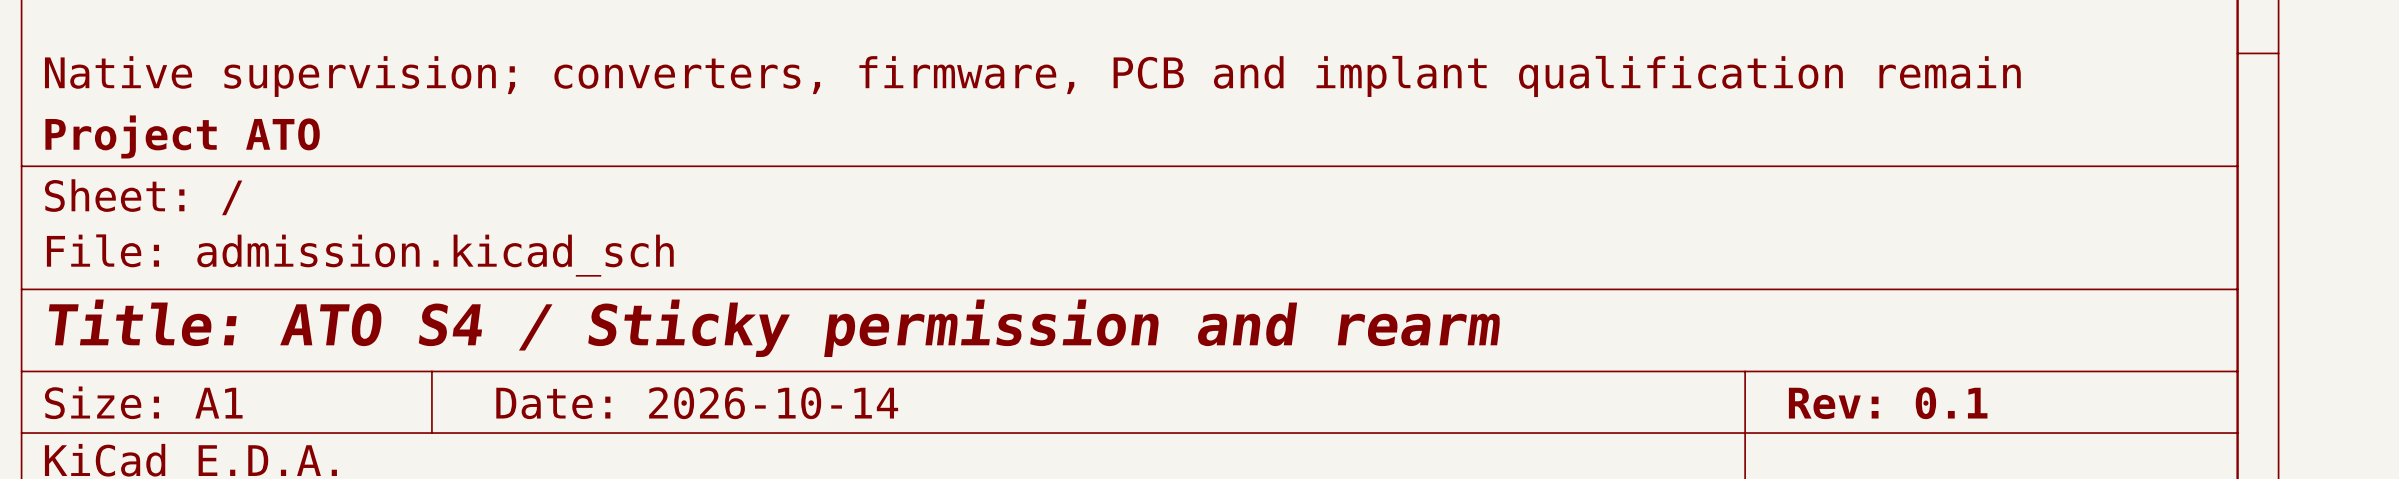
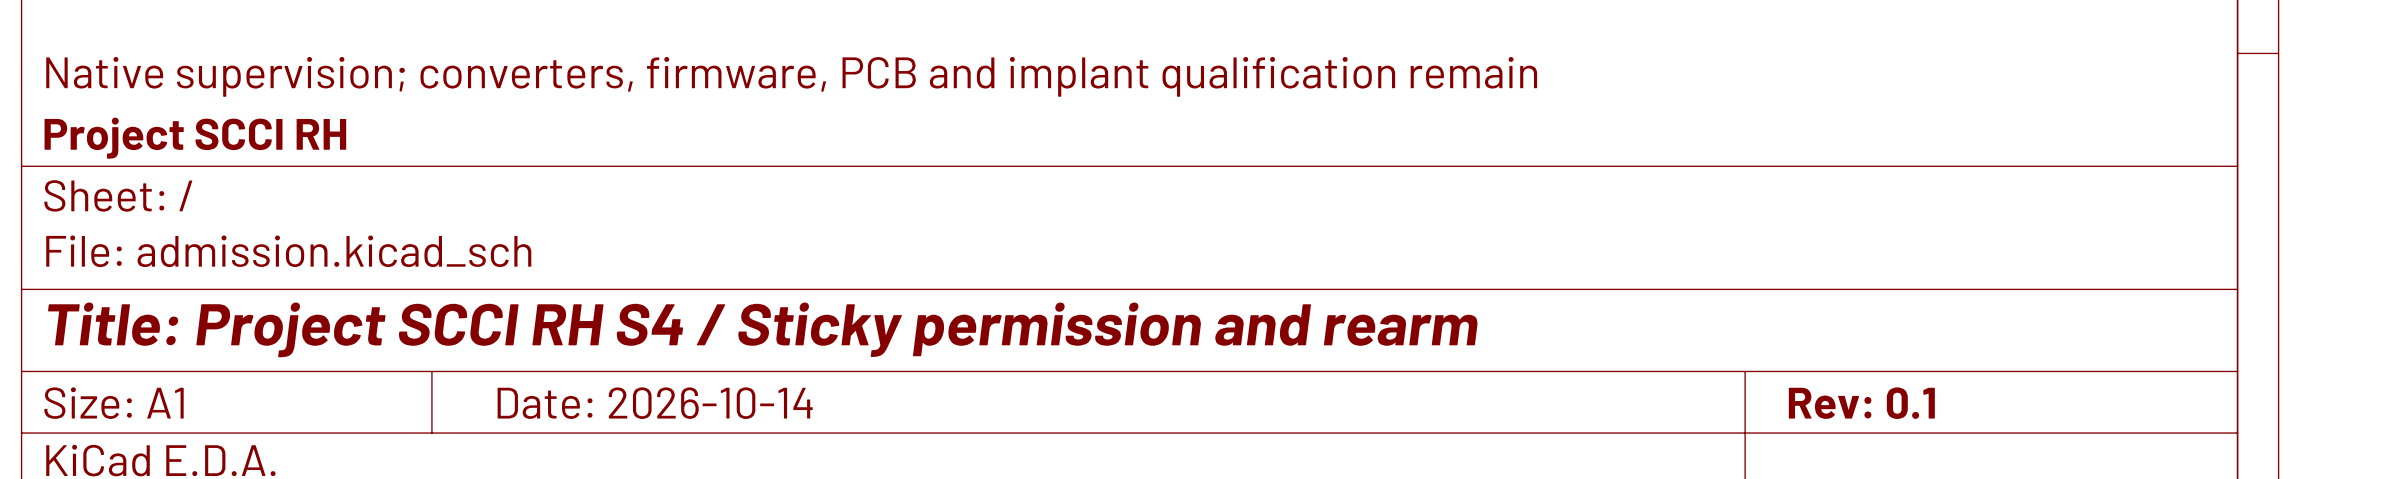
title block: Project ATO (182, 136) -> Project SCCI RH (195, 138)
title block: Title: ATO S4 / Sticky permission and rearm (774, 328) -> Title: Project SCCI RH S4 / Sticky permission and rearm (763, 329)

